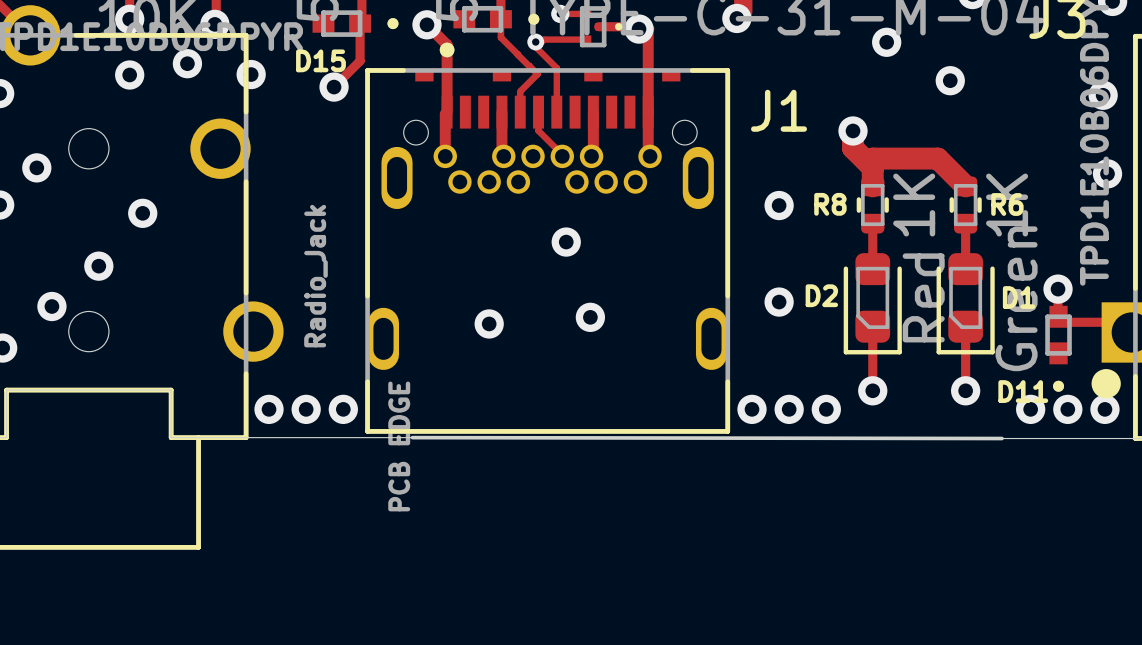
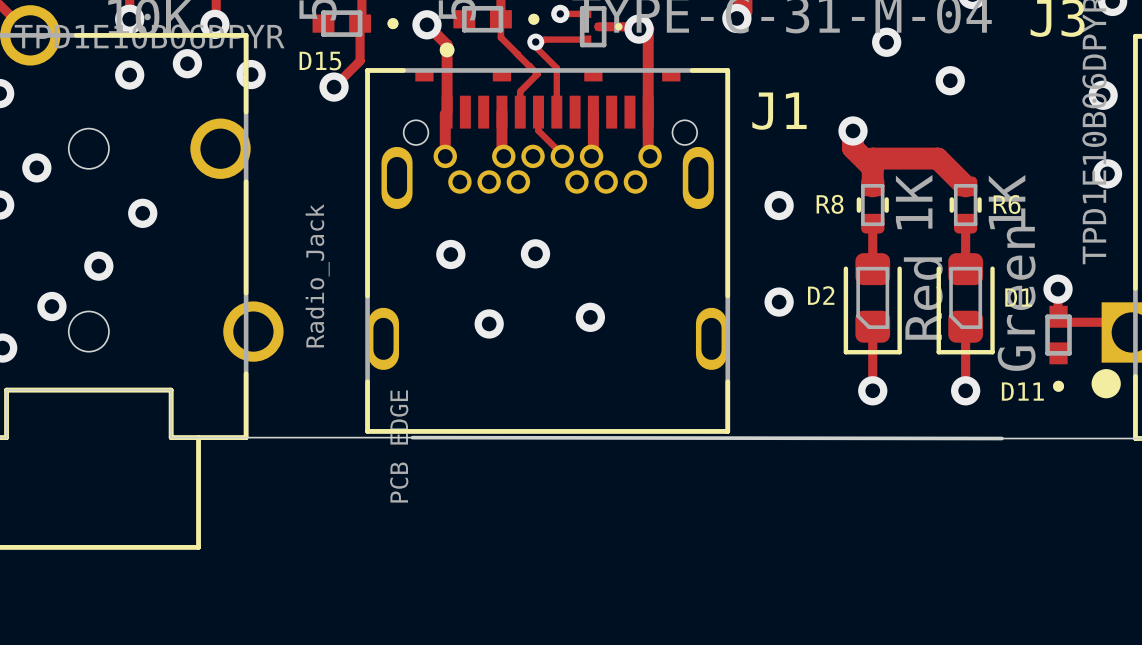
via position: (566, 242) -> (535, 253)
via: none -> (450, 254)
via: (269, 409) -> none
via: (306, 409) -> none
via: (343, 409) -> none
via: (752, 409) -> none
via: (789, 409) -> none
via: (826, 409) -> none
via: (1030, 409) -> none
via: (1067, 409) -> none
via: (1104, 409) -> none

